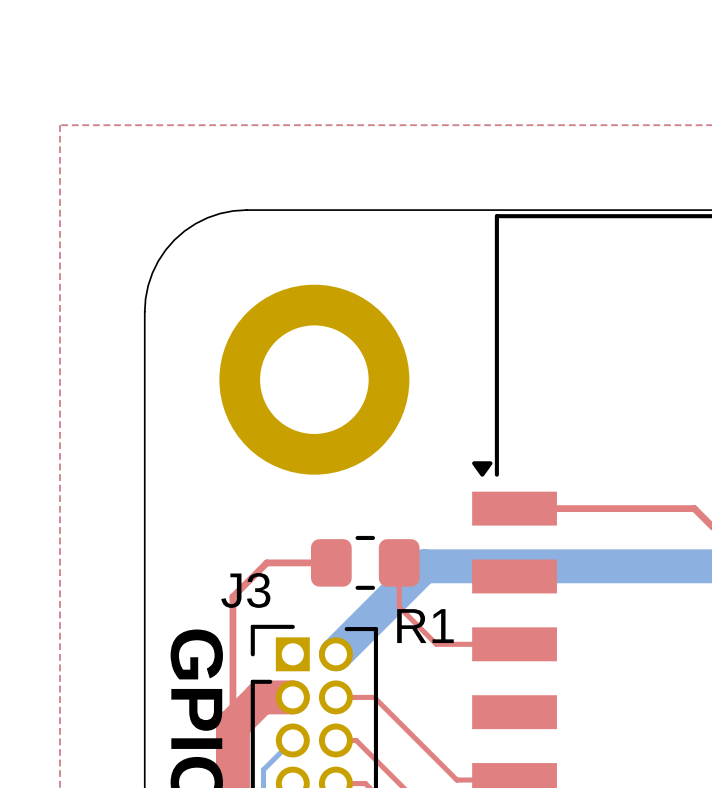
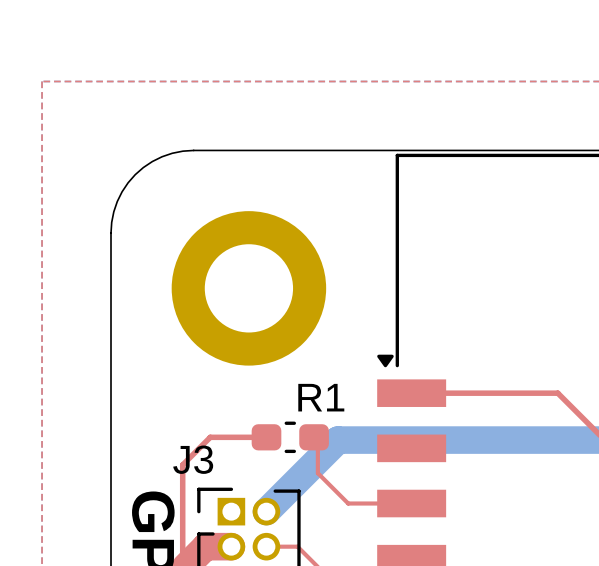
R1 footprint: [310, 535, 420, 590] -> [251, 421, 329, 454]
R1 name position: R1 (425, 626) -> R1 (321, 397)

